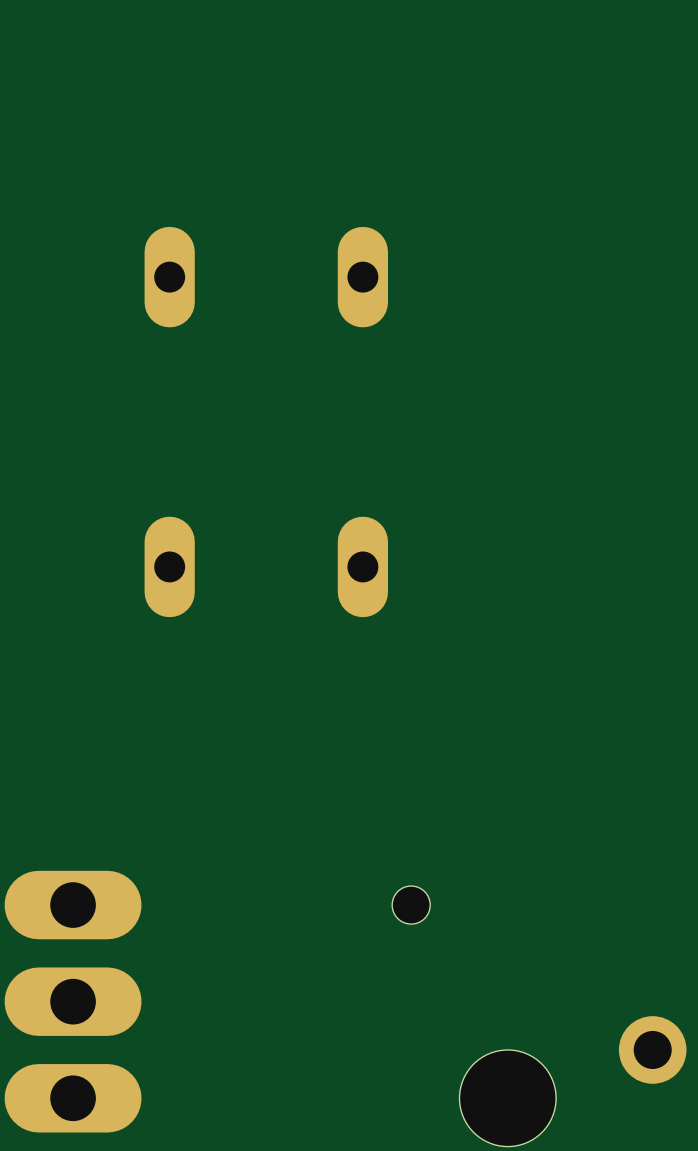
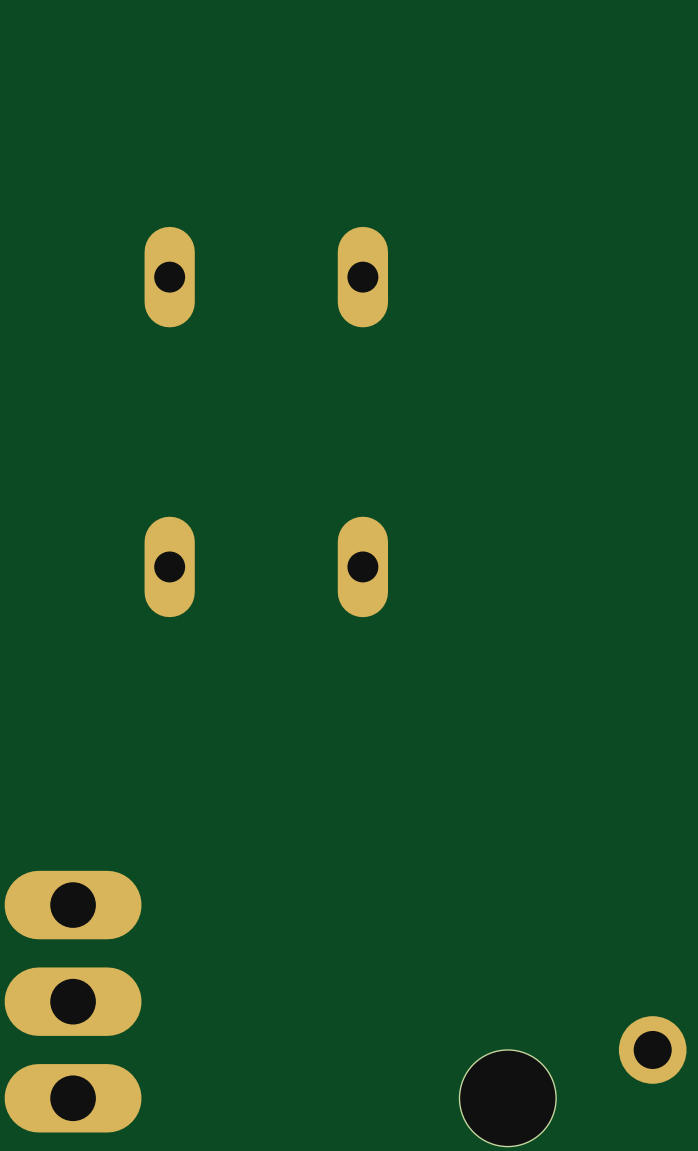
hole: (411, 905) -> none

